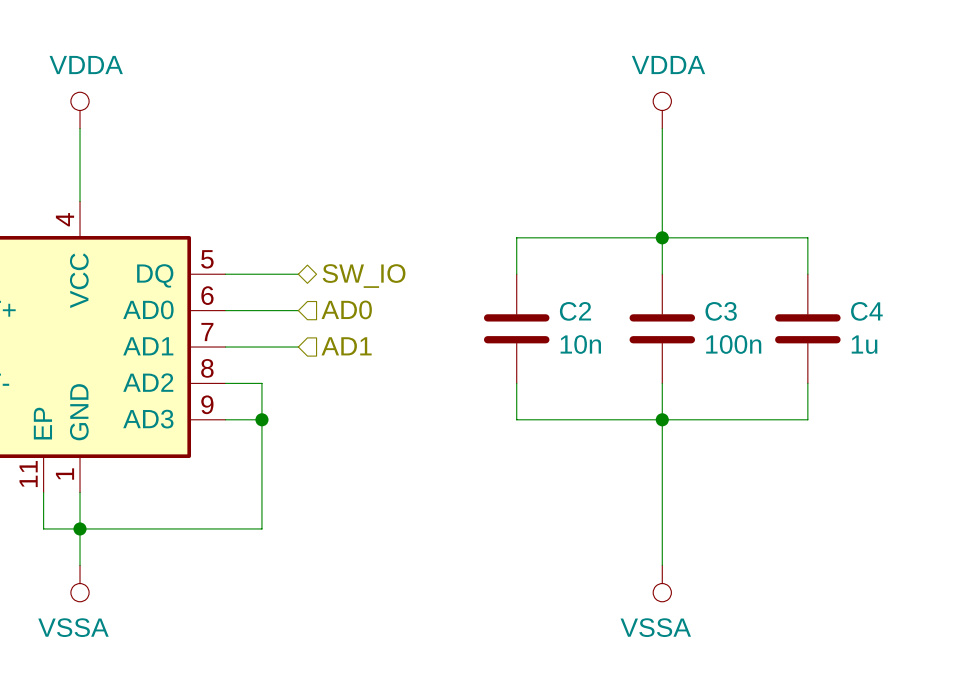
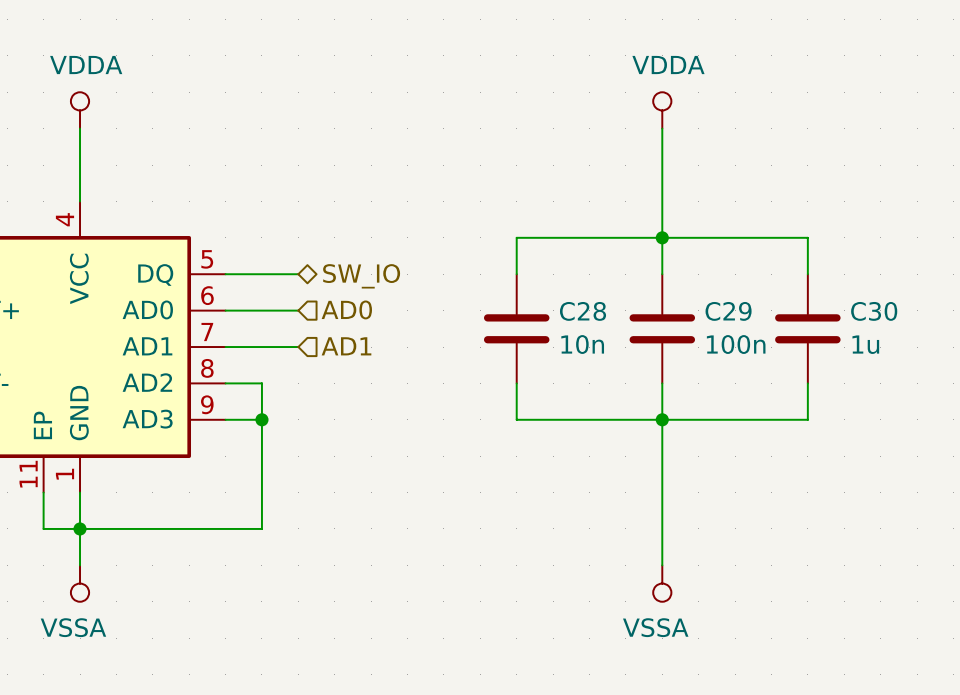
C2 name: C2 (575, 311) -> C28 (583, 311)
C3 name: C3 (721, 311) -> C29 (728, 311)
C4 name: C4 (866, 311) -> C30 (874, 311)

